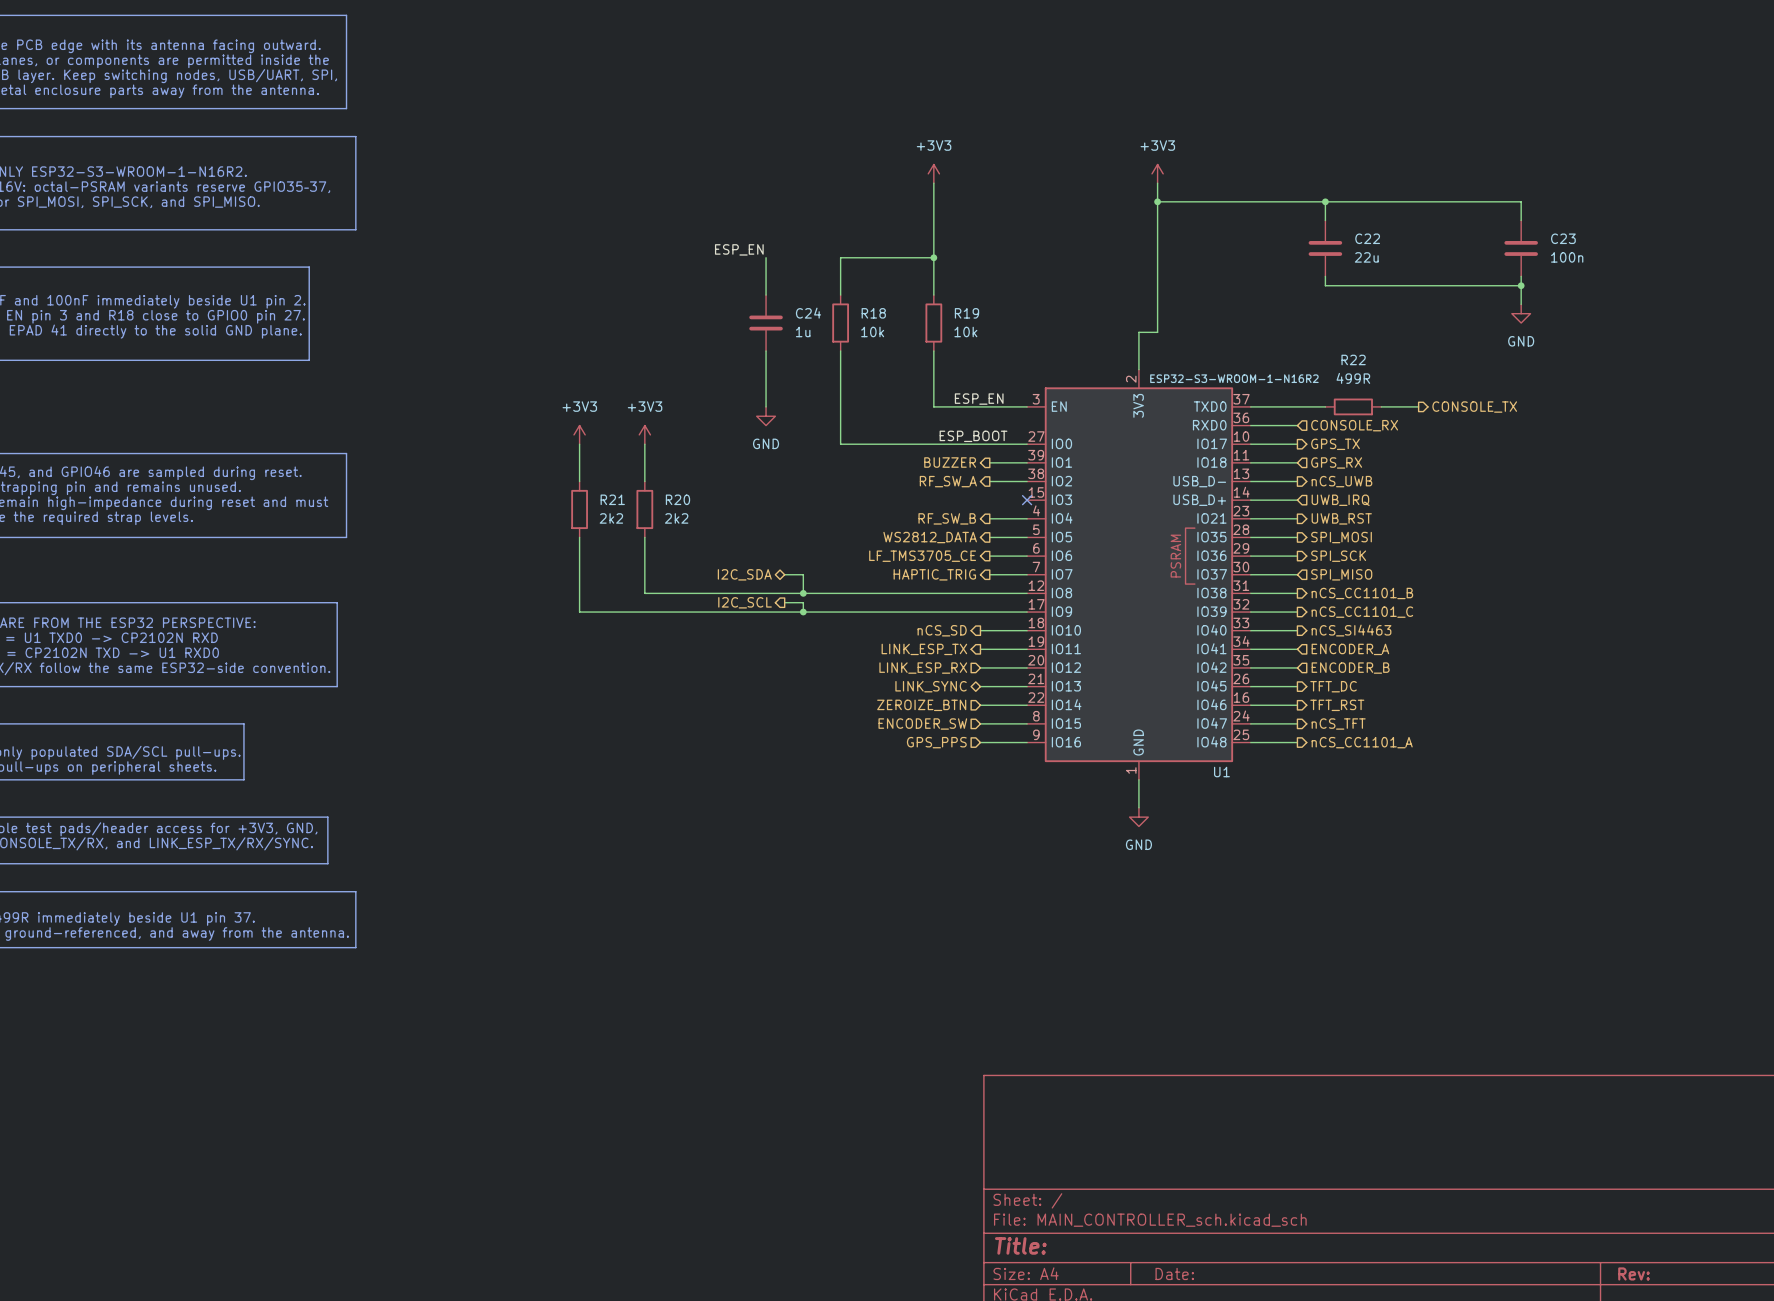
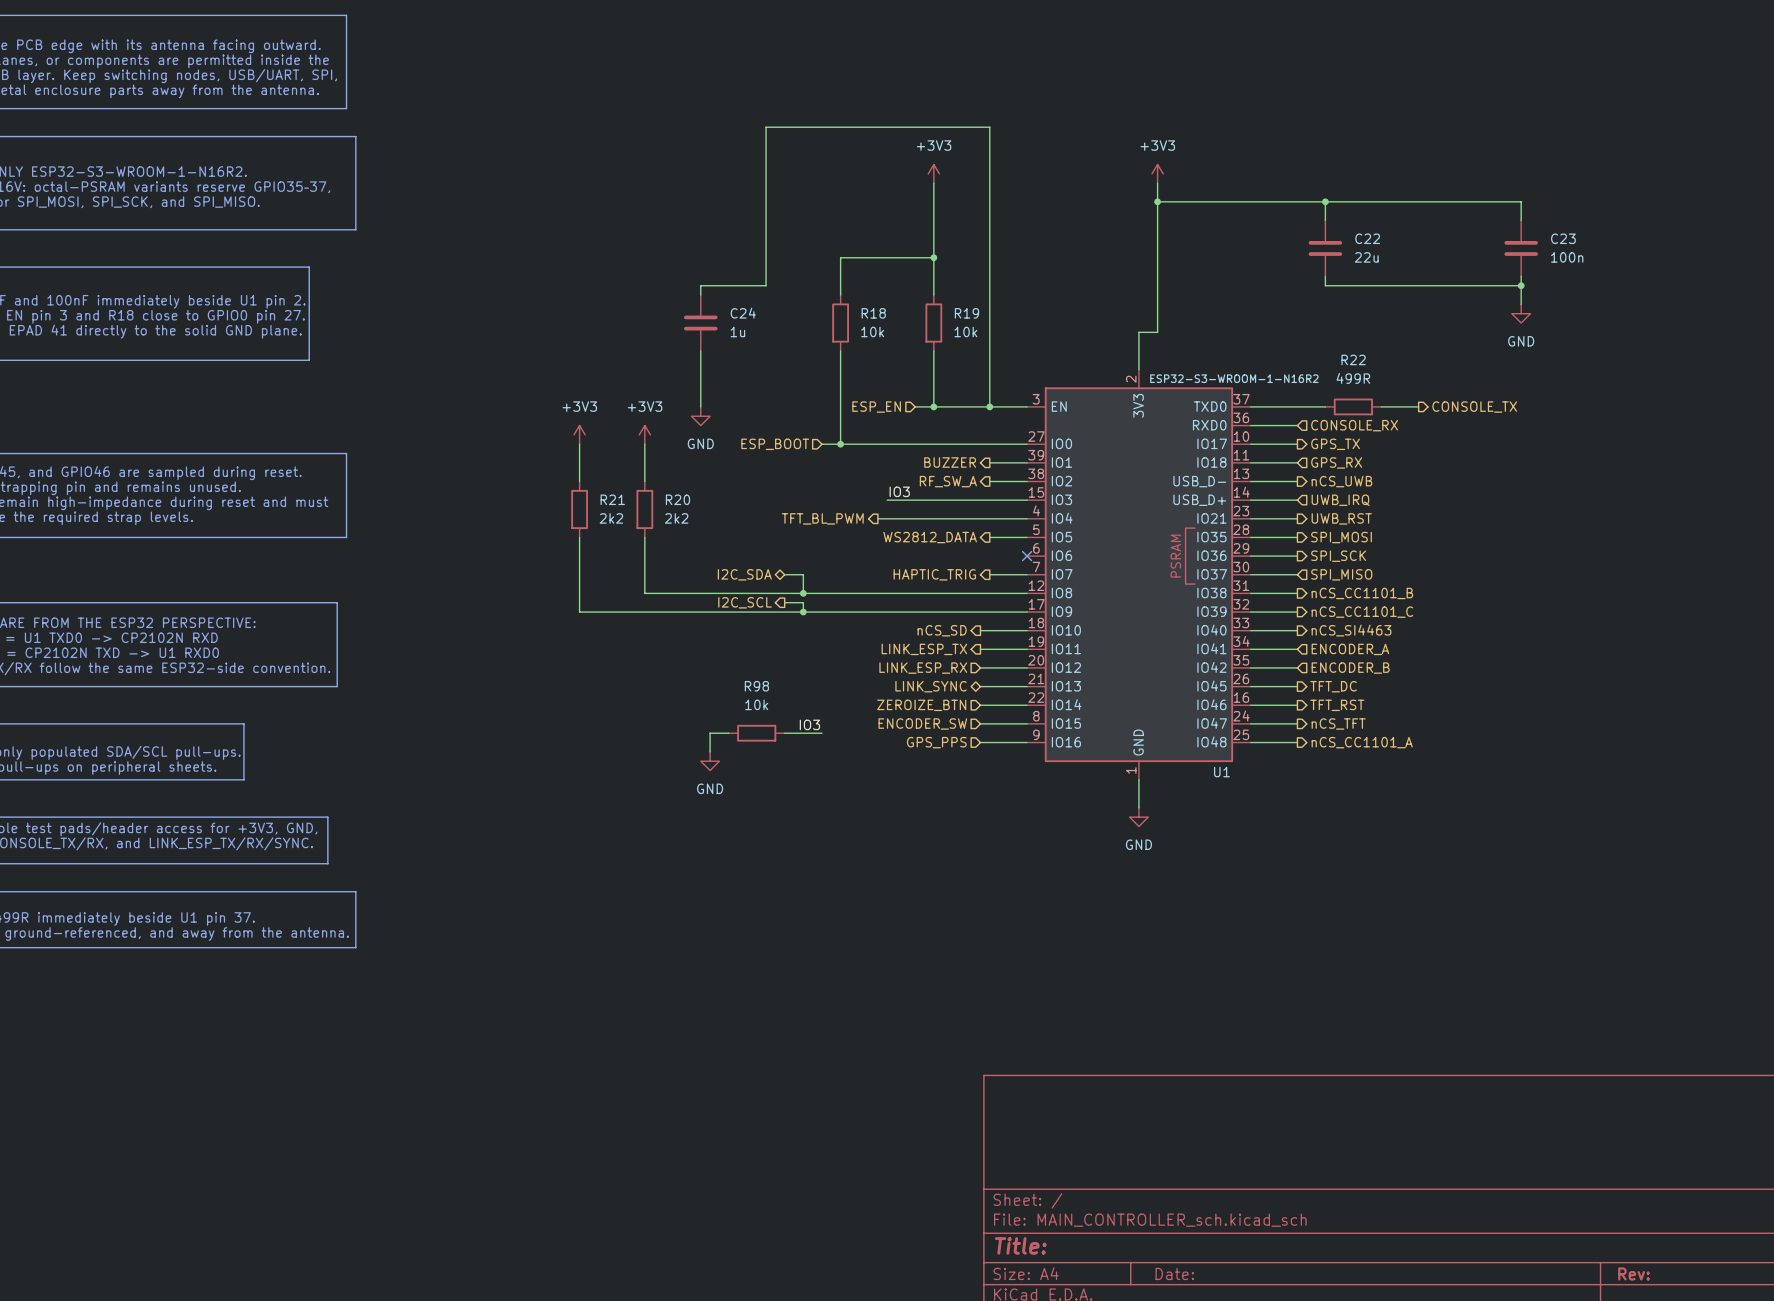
label: ESP_EN (739, 249) -> none
wire: none -> (766, 257) (766, 127) (989, 127) (989, 406)
wire: (766, 285) (766, 295) -> (766, 285) (700, 285) (700, 295)
C24 position: (766, 323) -> (700, 323)
wire: (766, 350) (766, 406) -> (700, 350) (700, 406)
label: ESP_EN (979, 399) -> none
wire: none -> (915, 406) (933, 406)
junction: none -> (933, 406)
junction: none -> (989, 406)
hierarchical label: none -> ESP_EN (876, 407)
power symbol position: GND (766, 416) -> GND (700, 416)
label: ESP_BOOT (973, 436) -> none
hierarchical label: none -> ESP_BOOT (775, 444)
wire: none -> (821, 444) (840, 444)
junction: none -> (840, 444)
label: none -> IO3 (899, 491)
wire: none -> (887, 500) (1027, 500)
no-connect mark: (1027, 500) -> none
hierarchical label: none -> TFT_BL_PWM (822, 518)
wire: none -> (877, 518) (989, 518)
hierarchical label: RF_SW_B (947, 518) -> none
hierarchical label: LF_TMS3705_CE (922, 556) -> none
wire: (989, 556) (1027, 556) -> none
no-connect mark: none -> (1027, 556)
label: none -> IO3 (809, 724)
wire: none -> (728, 733) (710, 733) (710, 751)
R98: none -> 10k (756, 733)
wire: none -> (784, 733) (821, 733)
power symbol: none -> GND (710, 761)

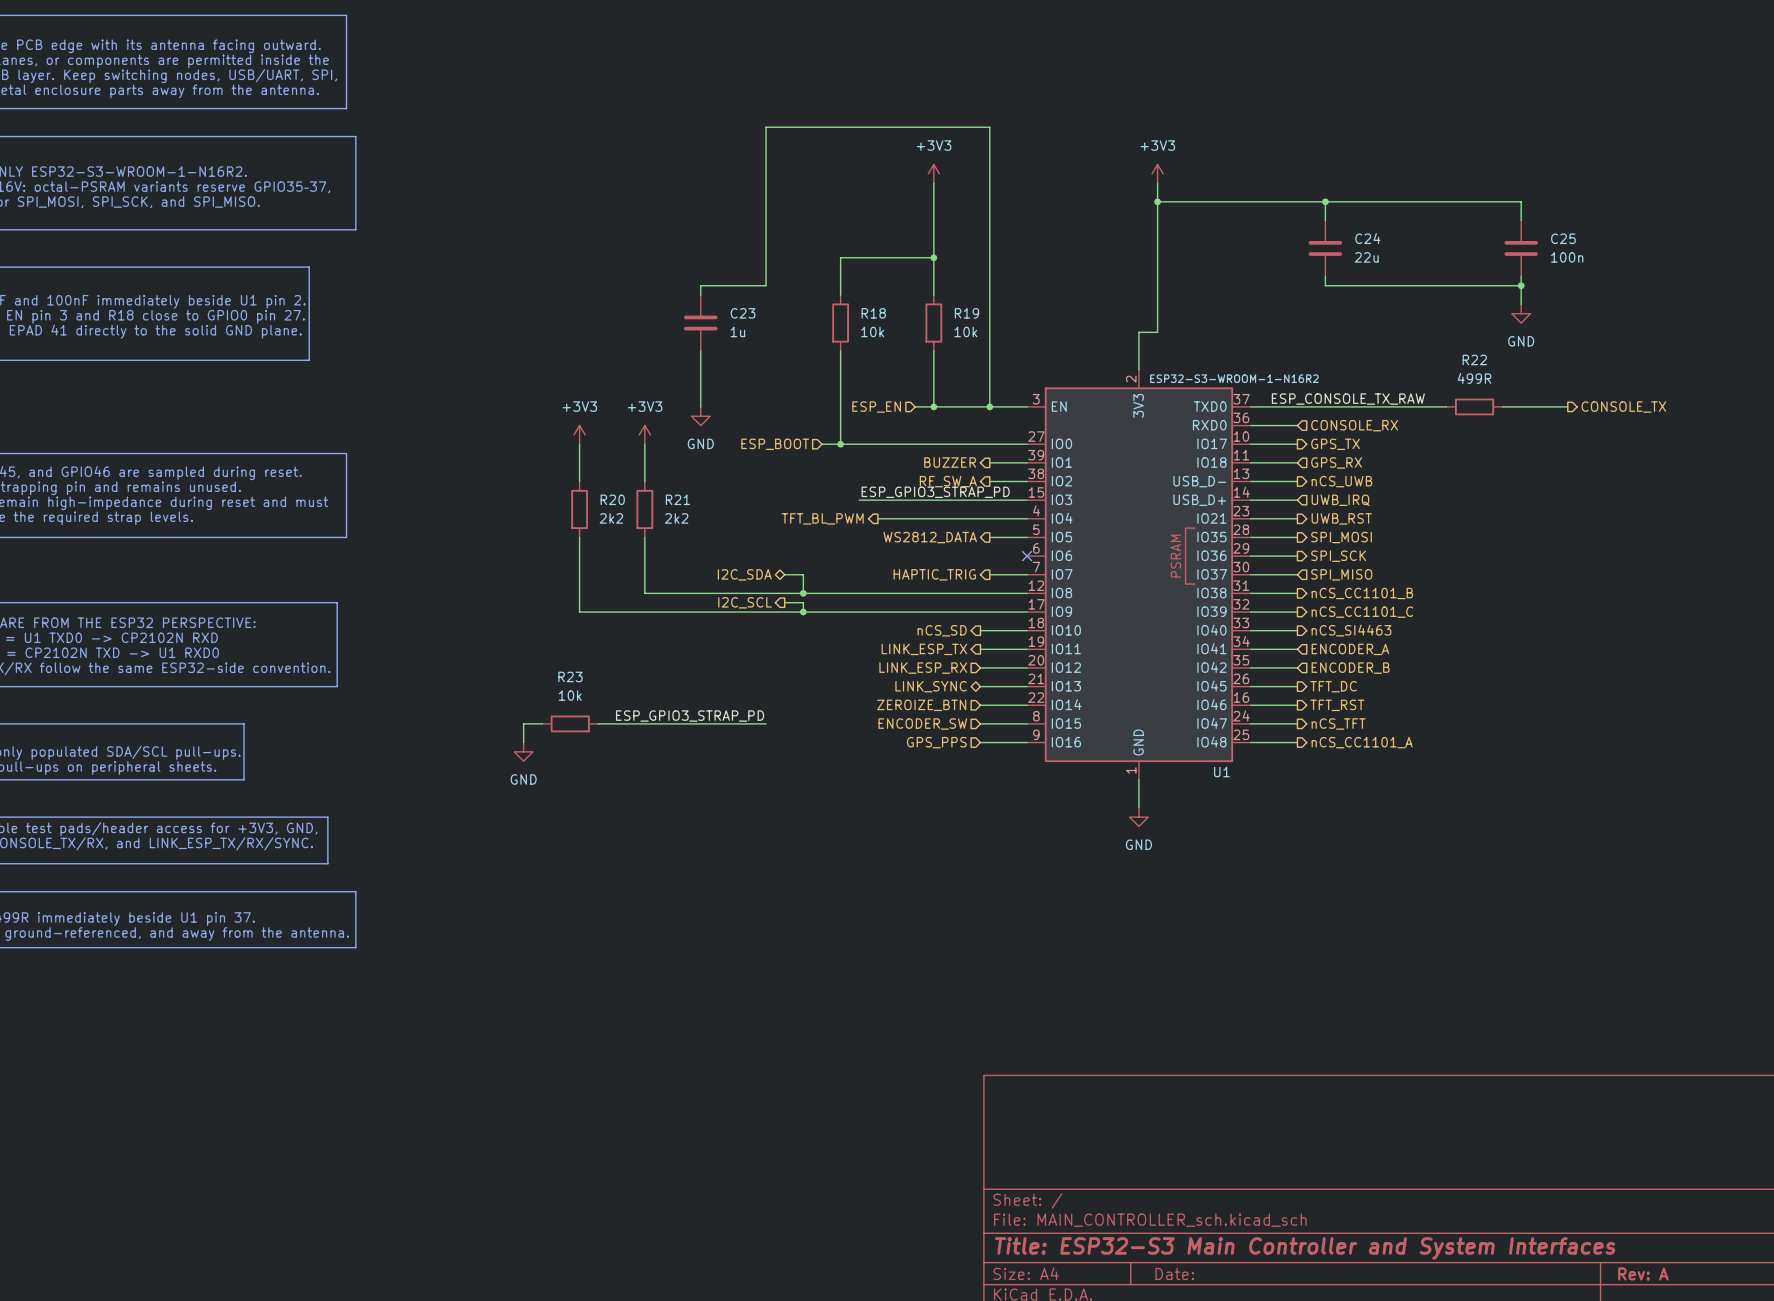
C22 name: C22 (1367, 238) -> C24 (1367, 238)
C23 name: C23 (1563, 238) -> C25 (1563, 238)
C24 name: C24 (743, 313) -> C23 (743, 313)
label: none -> ESP_CONSOLE_TX_RAW (1348, 399)
wire: none -> (1325, 406) (1381, 406)
R22 position: (1353, 406) -> (1474, 406)
wire: none -> (1418, 406) (1446, 406)
wire: none -> (1502, 406) (1567, 406)
hierarchical label position: CONSOLE_TX (1474, 407) -> CONSOLE_TX (1623, 407)
label: IO3 (899, 491) -> none
label: none -> ESP_GPIO3_STRAP_PD (935, 492)
R21 name: R21 (612, 499) -> R20 (612, 499)
R20 name: R20 (677, 499) -> R21 (677, 499)
wire: none -> (859, 500) (887, 500)
label: none -> ESP_GPIO3_STRAP_PD (690, 716)
wire: none -> (542, 723) (523, 723) (523, 742)
R23: none -> 10k (570, 723)
wire: none -> (598, 723) (766, 723)
label: IO3 (809, 724) -> none
wire: (728, 733) (710, 733) (710, 751) -> none
R98: 10k (756, 733) -> none
wire: (784, 733) (821, 733) -> none
power symbol: none -> GND (523, 751)
power symbol: GND (710, 761) -> none
title block: Title: (1020, 1245) -> Title: ESP32-S3 Main Controller and System Interfaces (1305, 1248)
title block: Rev: (1633, 1273) -> Rev: A (1643, 1273)

